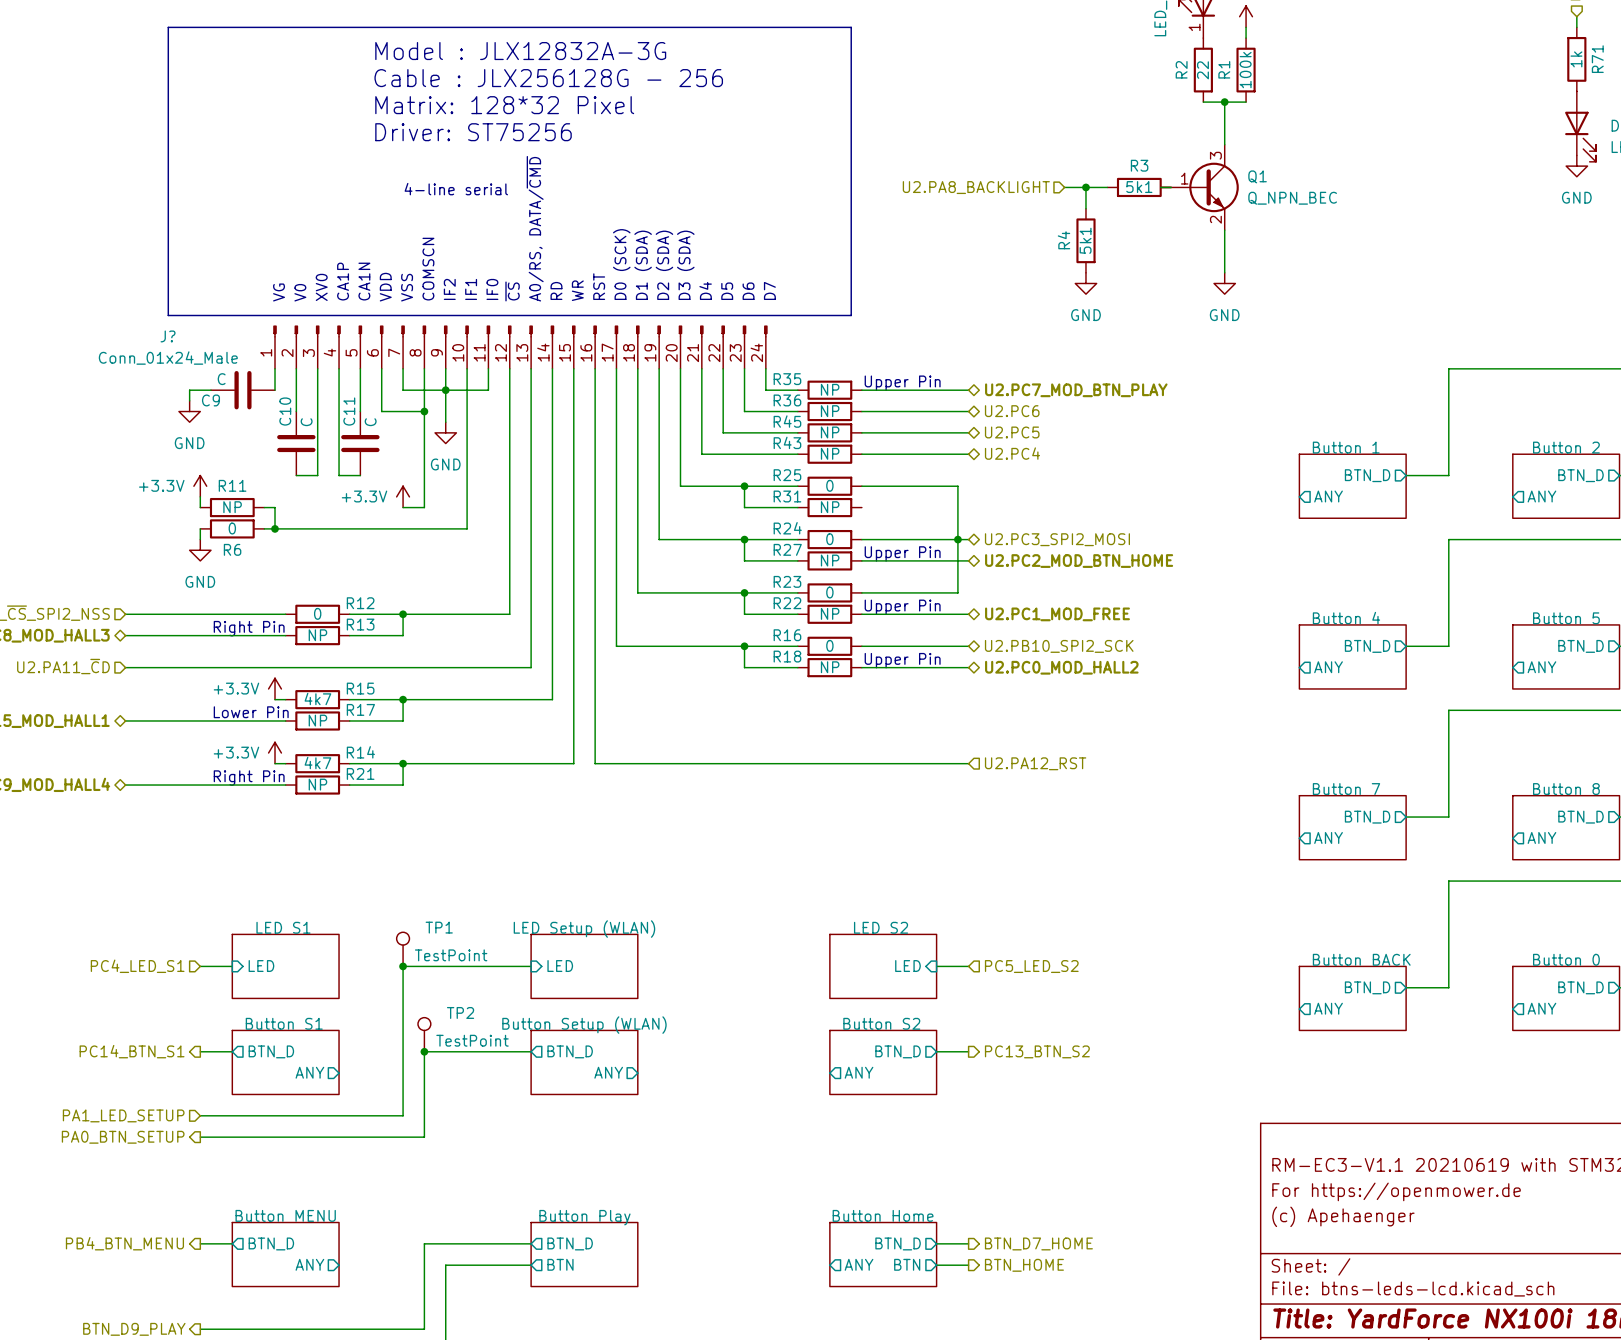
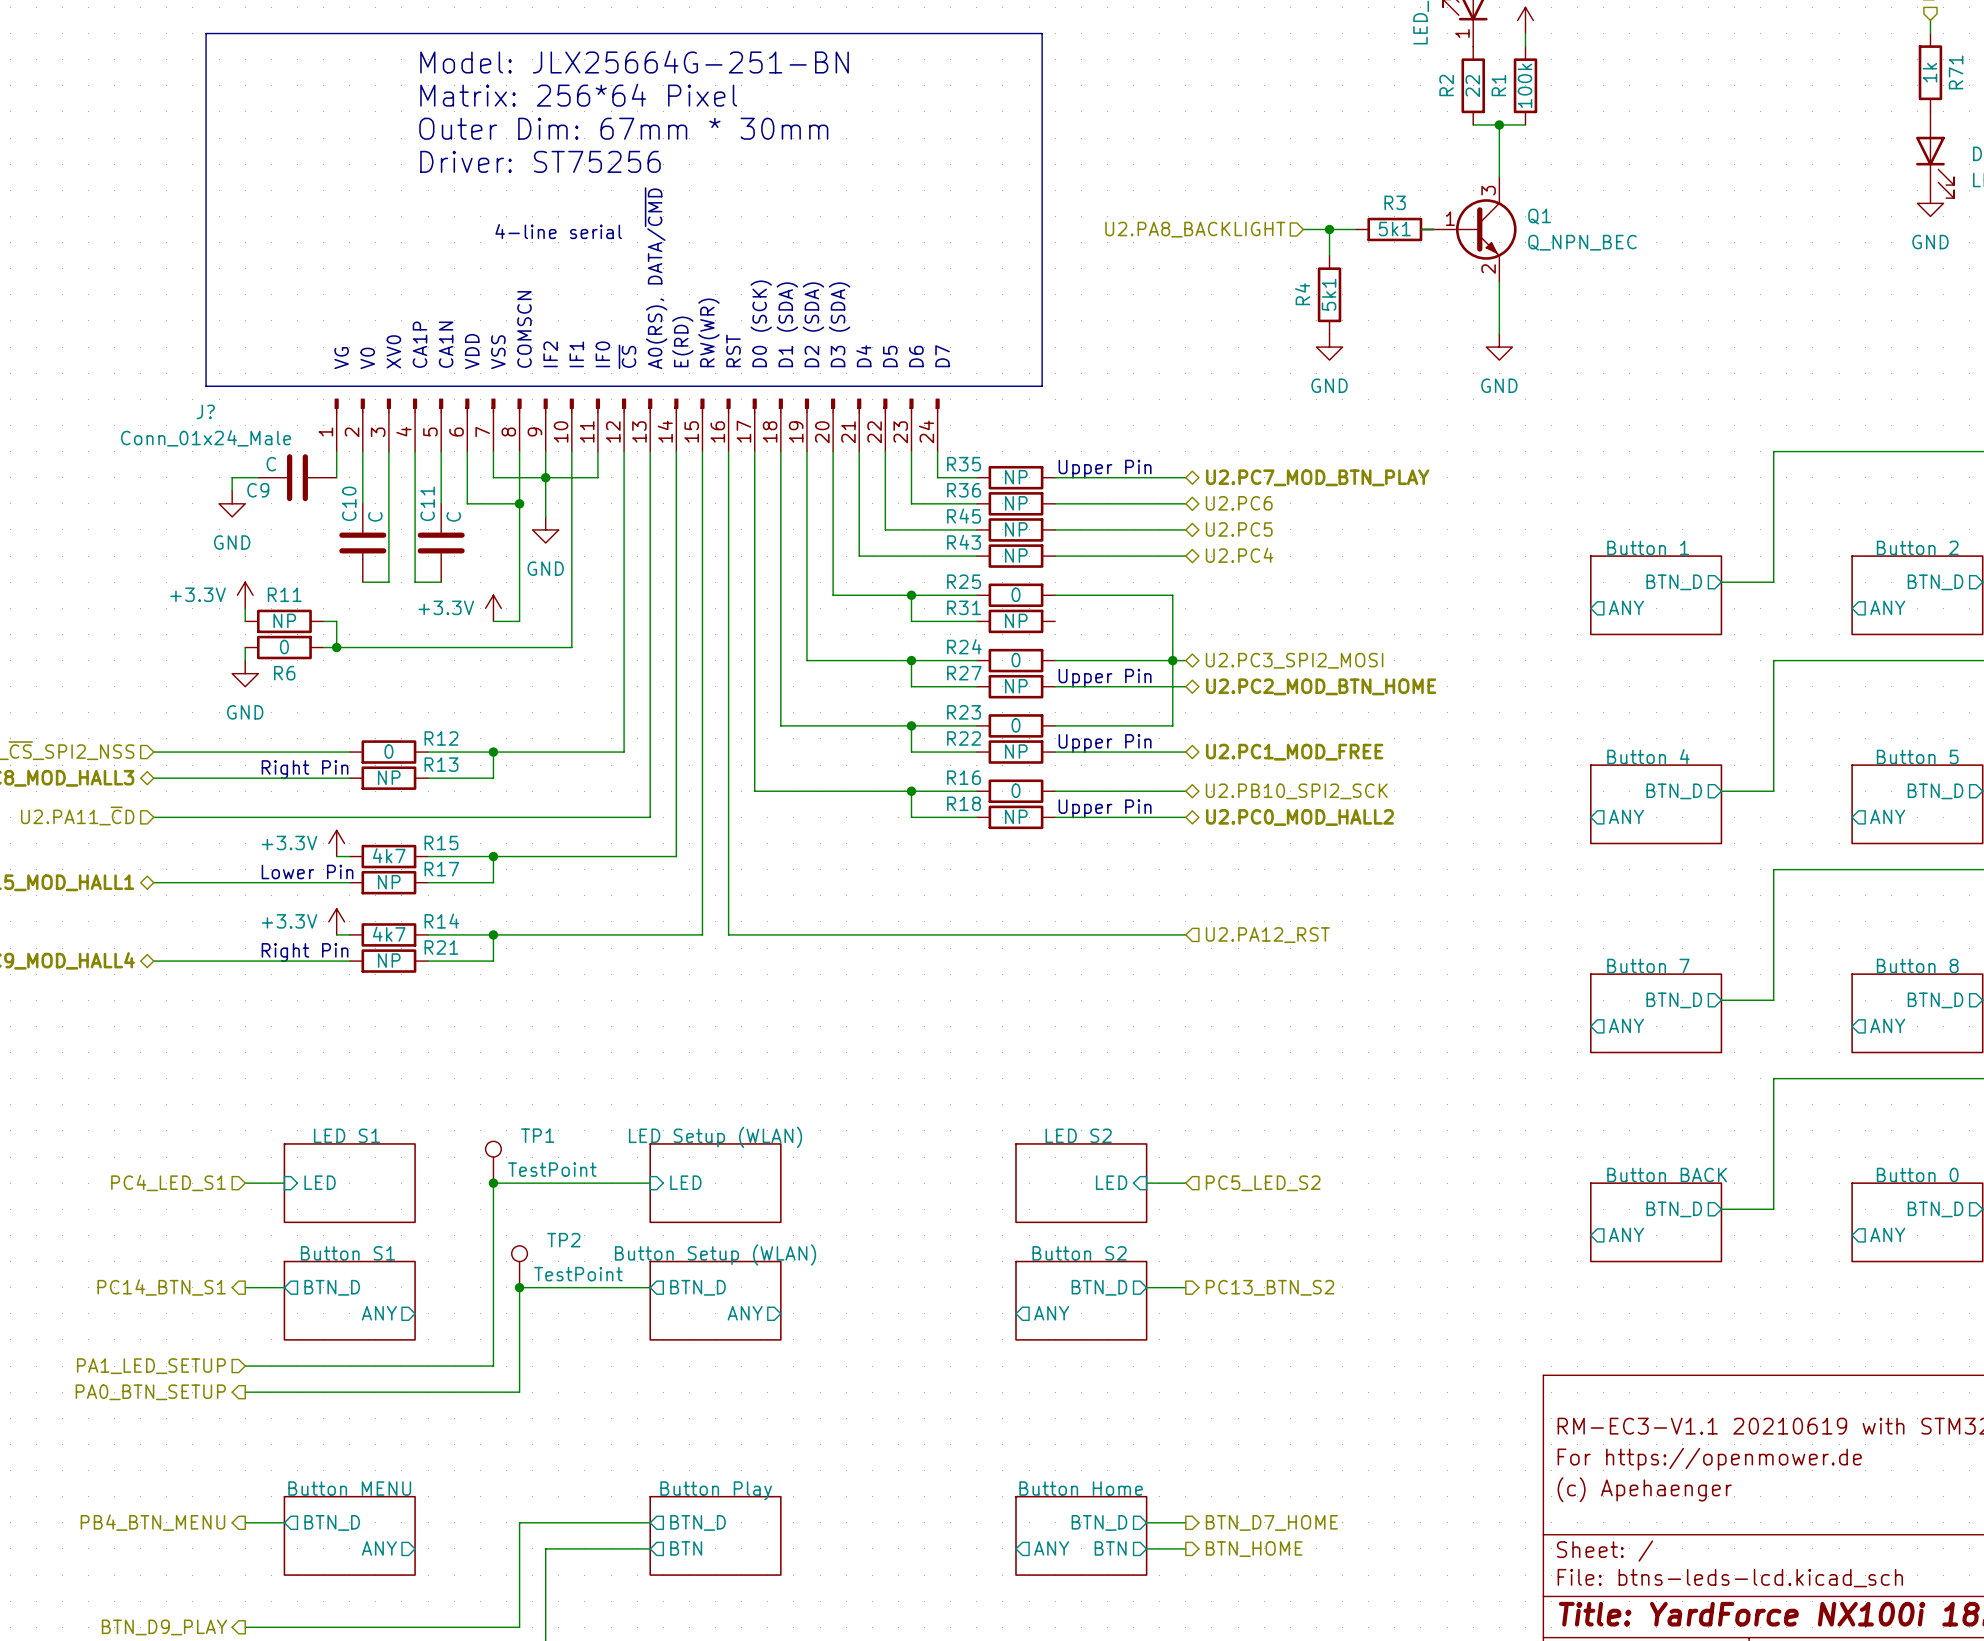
text: none -> Model: JLX25664G-251-BN (634, 62)
text: Model : JLX12832A-3G (520, 51) -> none
text: Cable : JLX256128G - 256 (548, 78) -> none
text: Matrix: 128*32 Pixel (504, 105) -> Matrix: 256*64 Pixel (578, 95)
text: none -> Outer Dim: 67mm * 30mm (623, 128)
text position: Driver: ST75256 (473, 132) -> Driver: ST75256 (540, 161)
text: A0/RS, DATA/~{CMD} (535, 228) -> A0(RS), DATA/~{CMD} (656, 278)
text: RD (556, 290) -> E(RD) (682, 341)
text: WR (577, 290) -> RW(WR) (708, 332)

